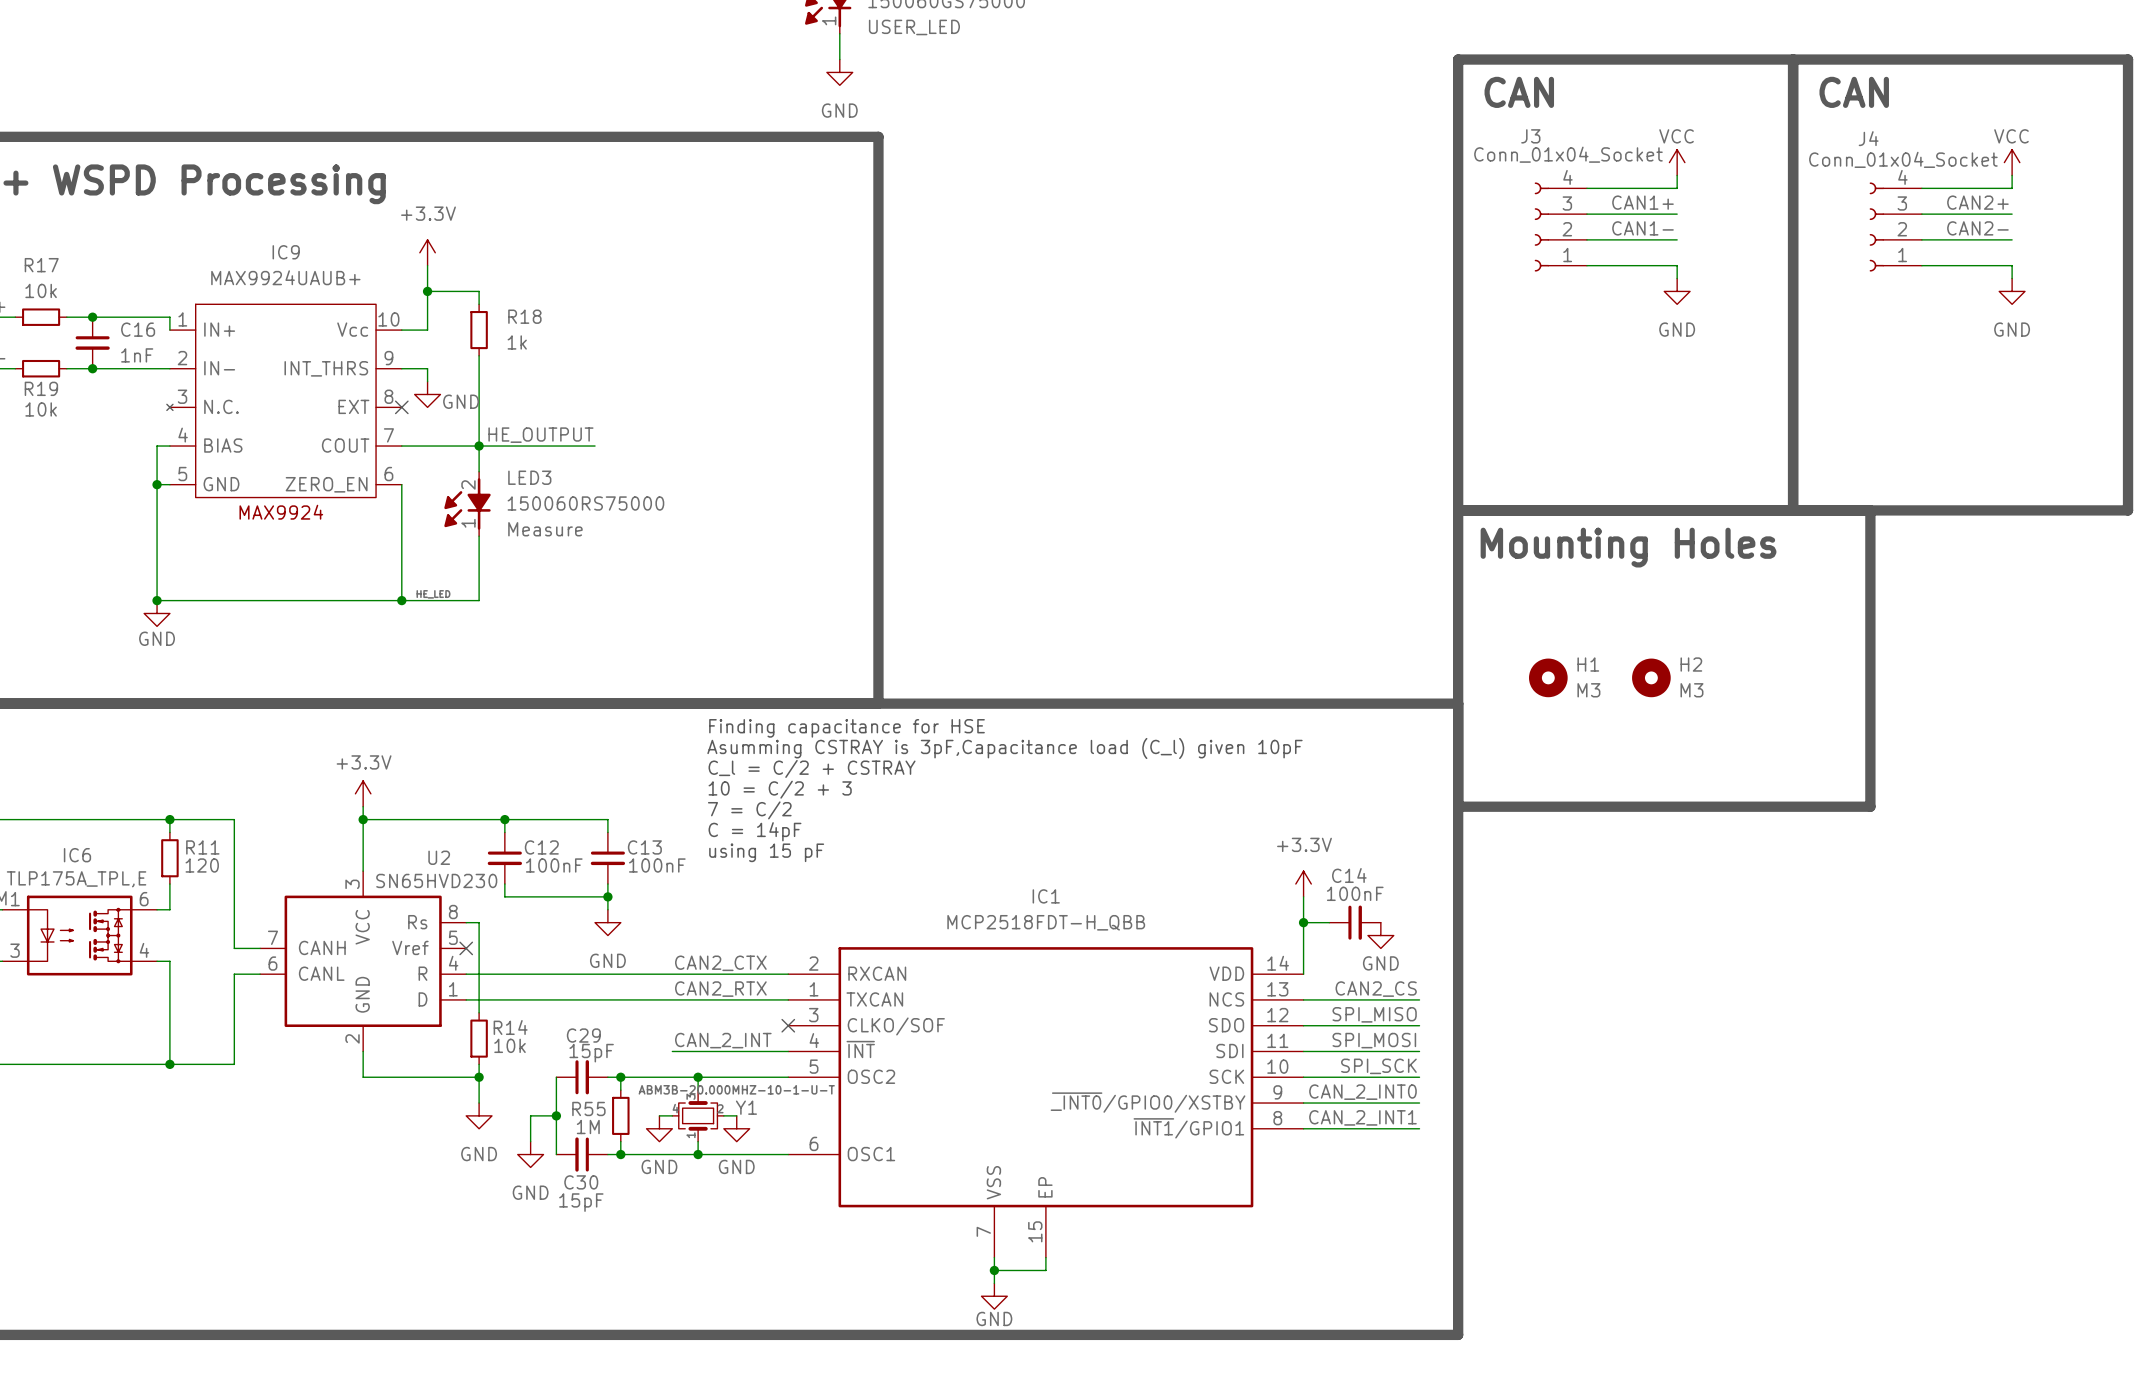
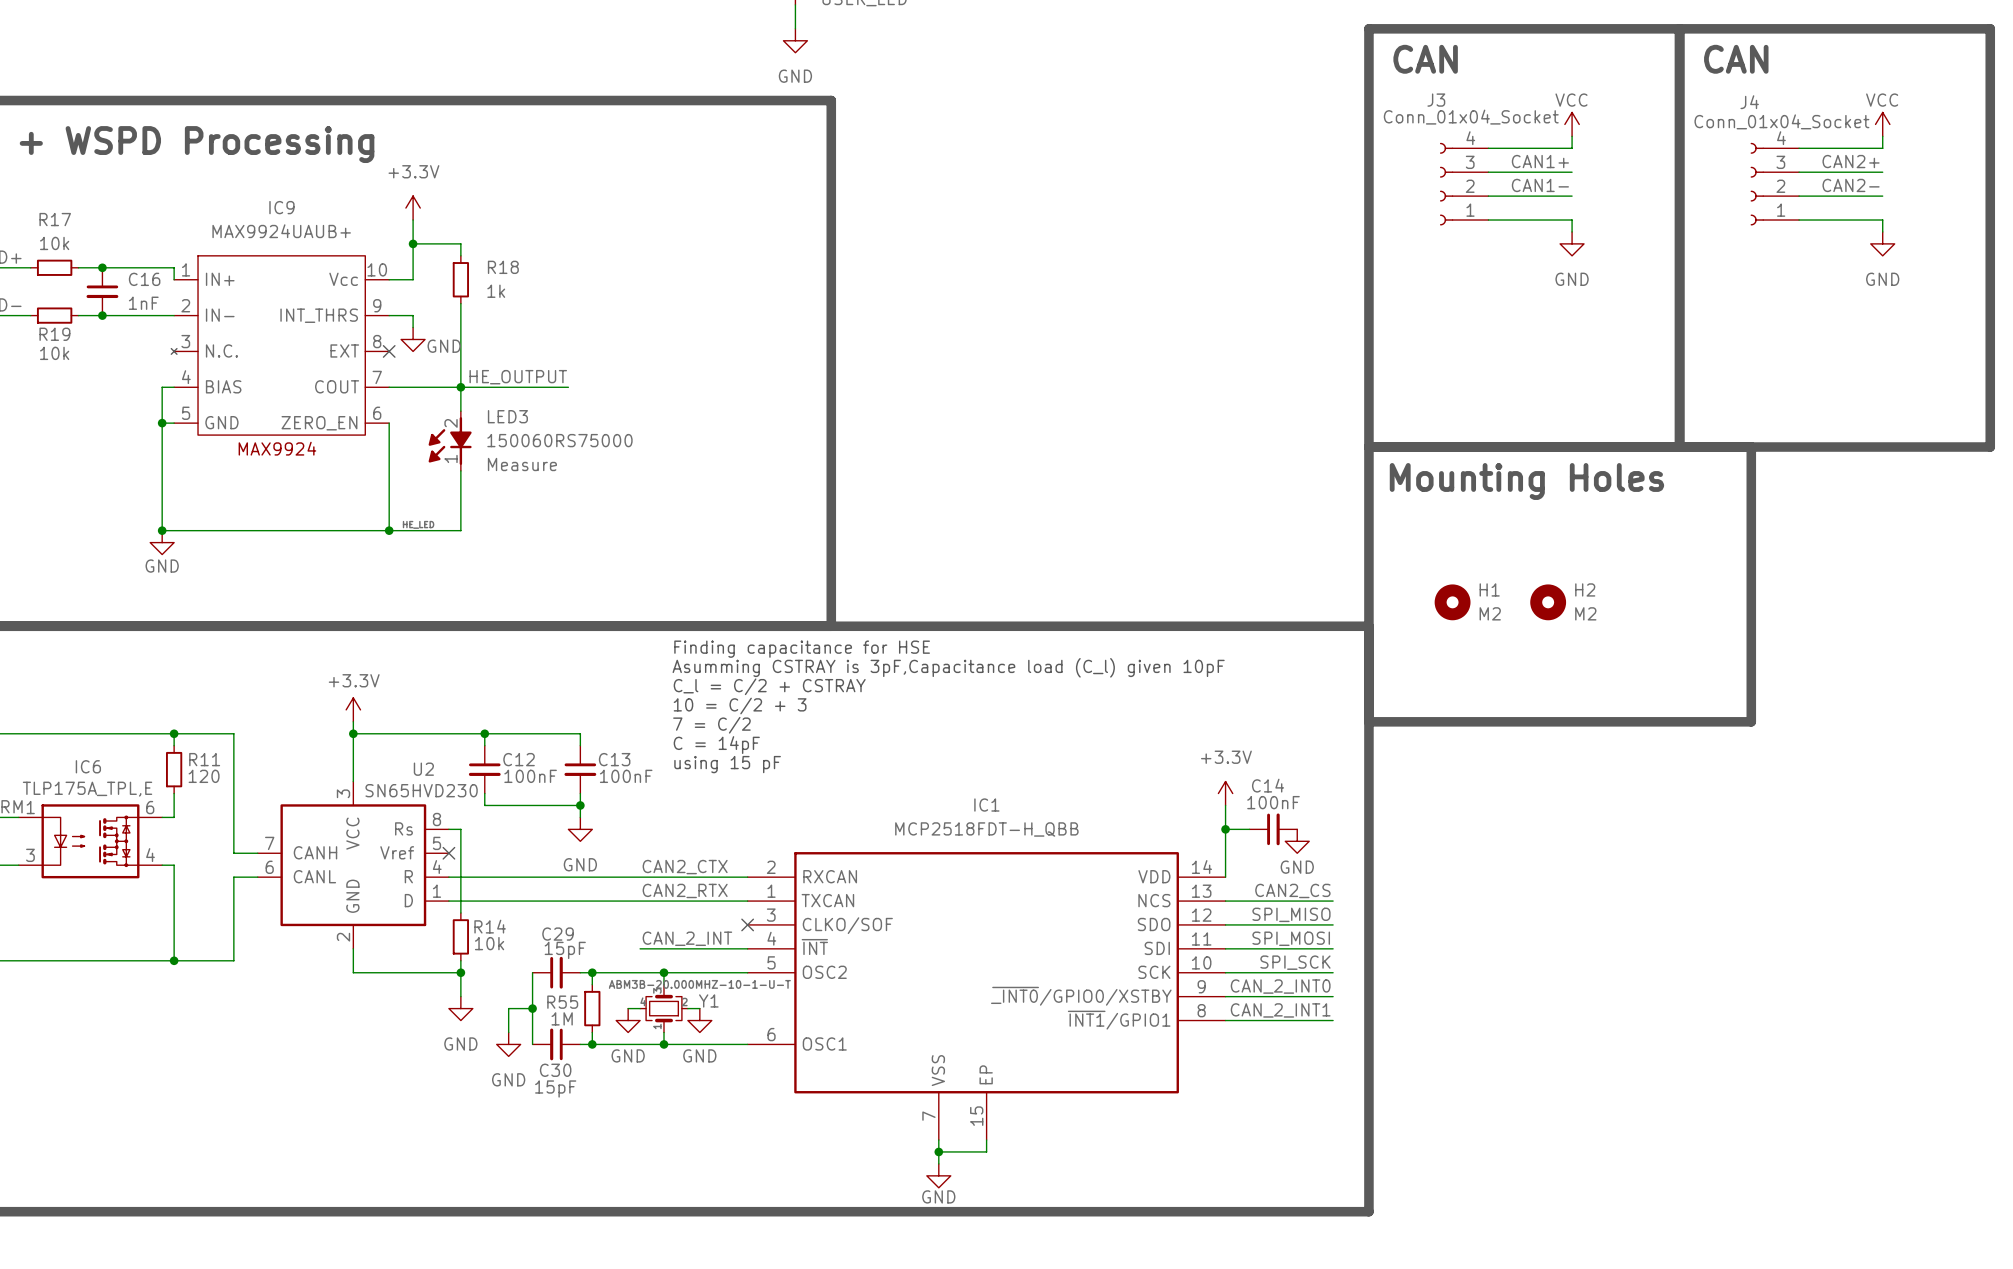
H1 value: M3 (1588, 690) -> M2 (1490, 613)
H2 value: M3 (1691, 690) -> M2 (1585, 613)

